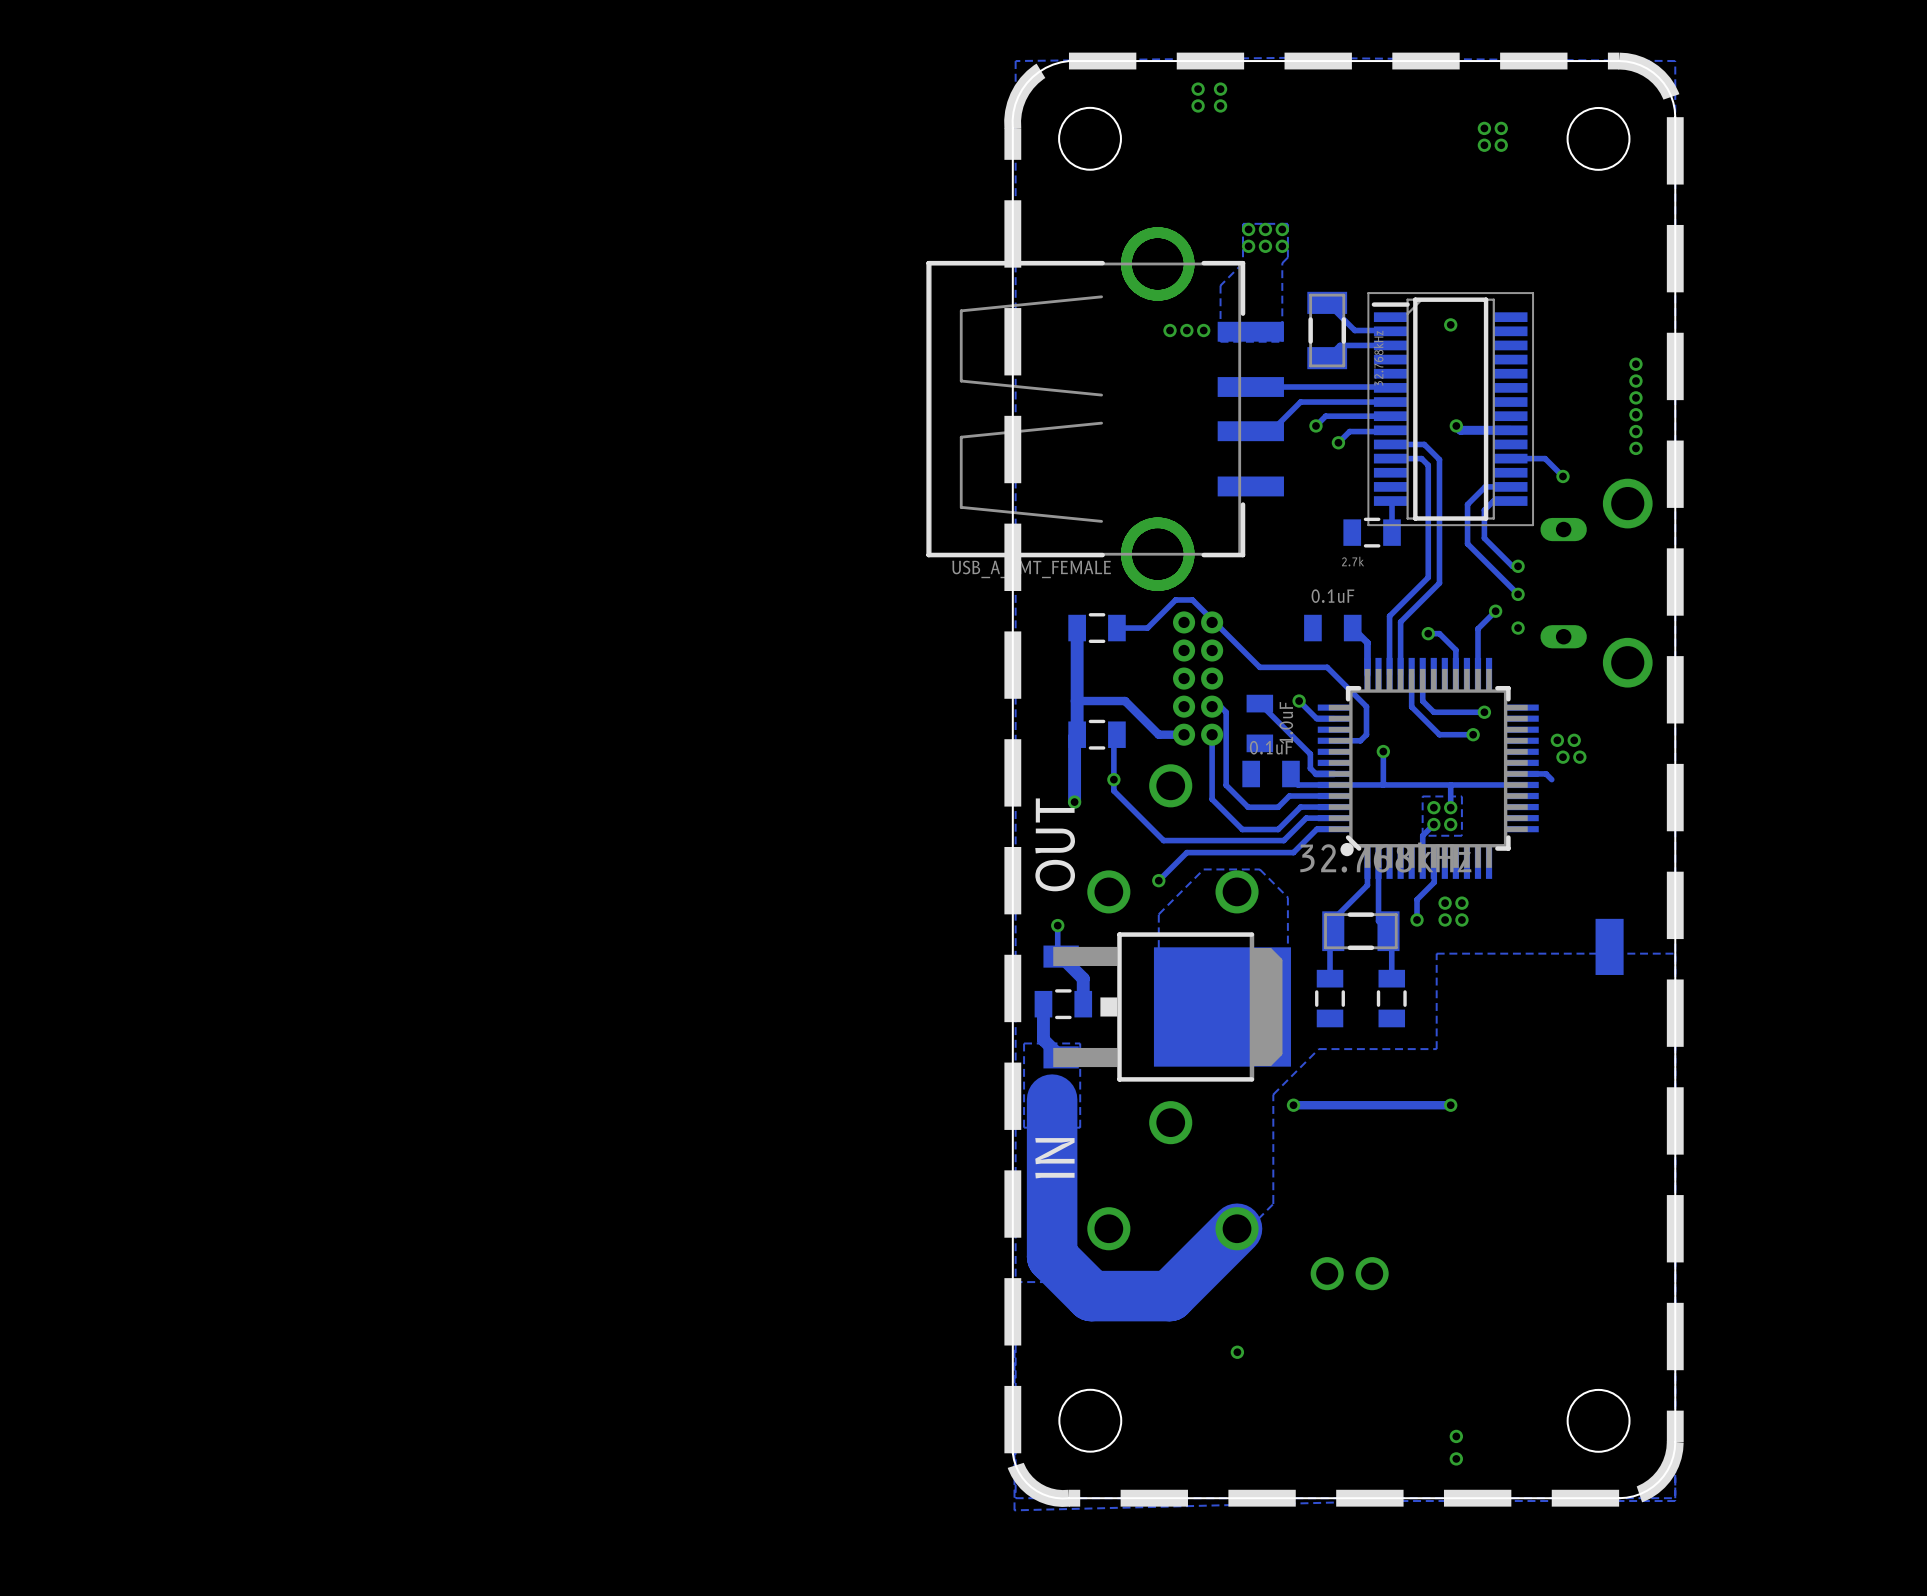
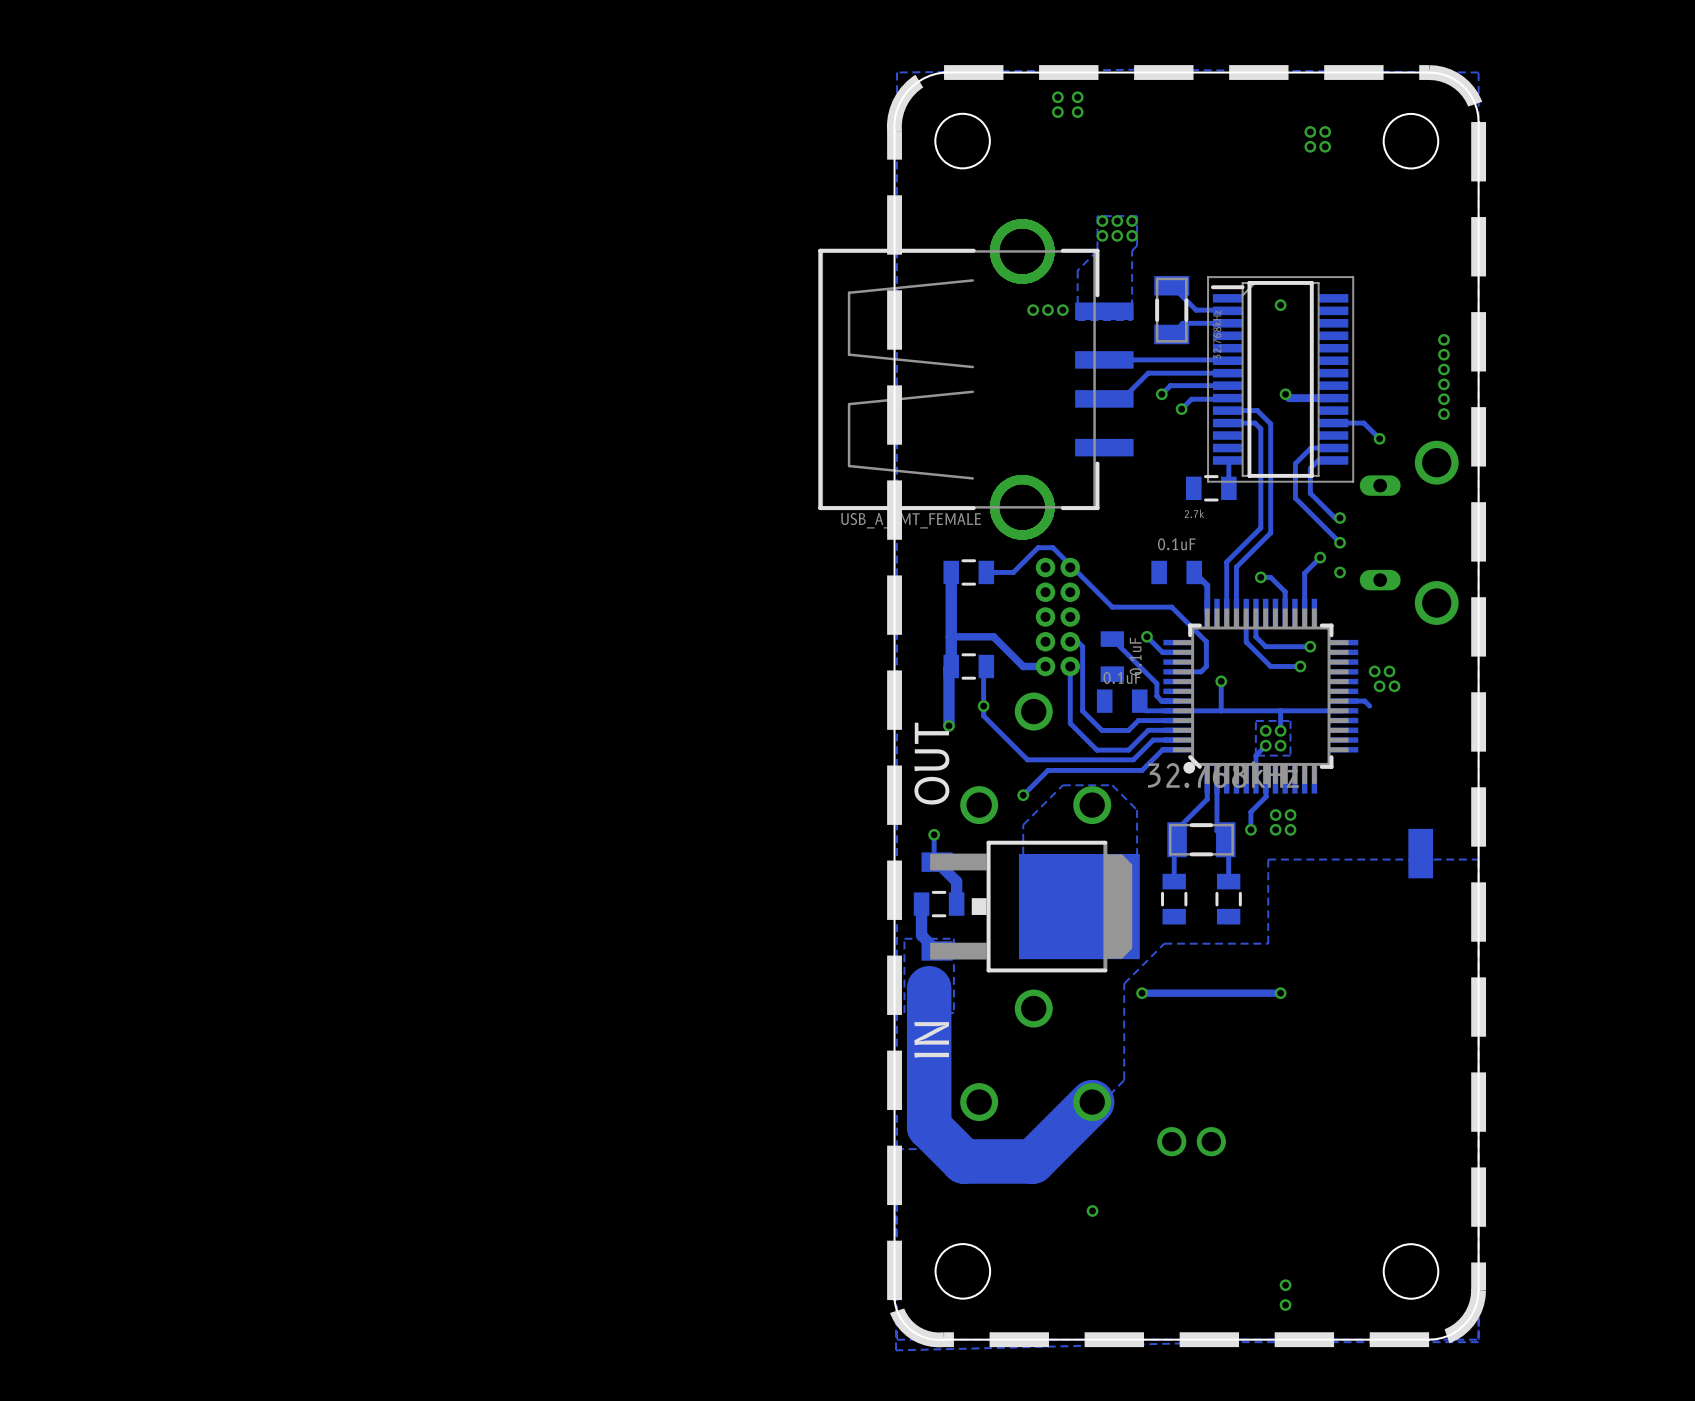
part value: 1.0uF (1286, 722) -> 0.1uF (1135, 656)

